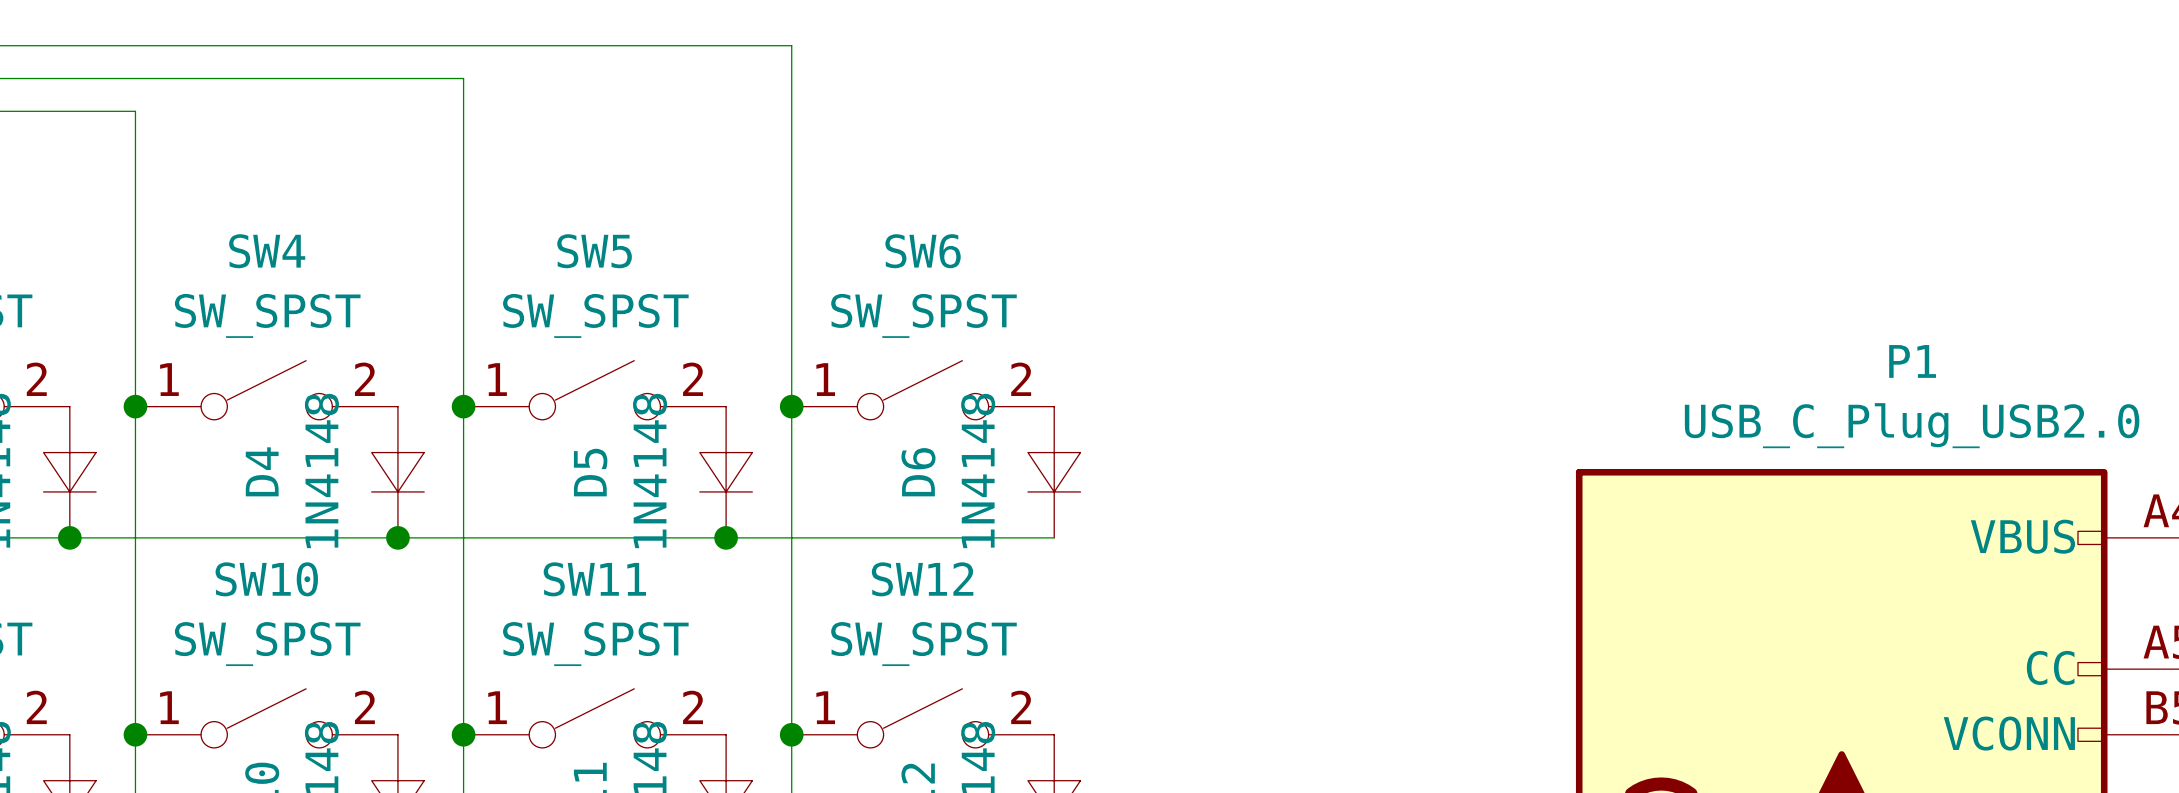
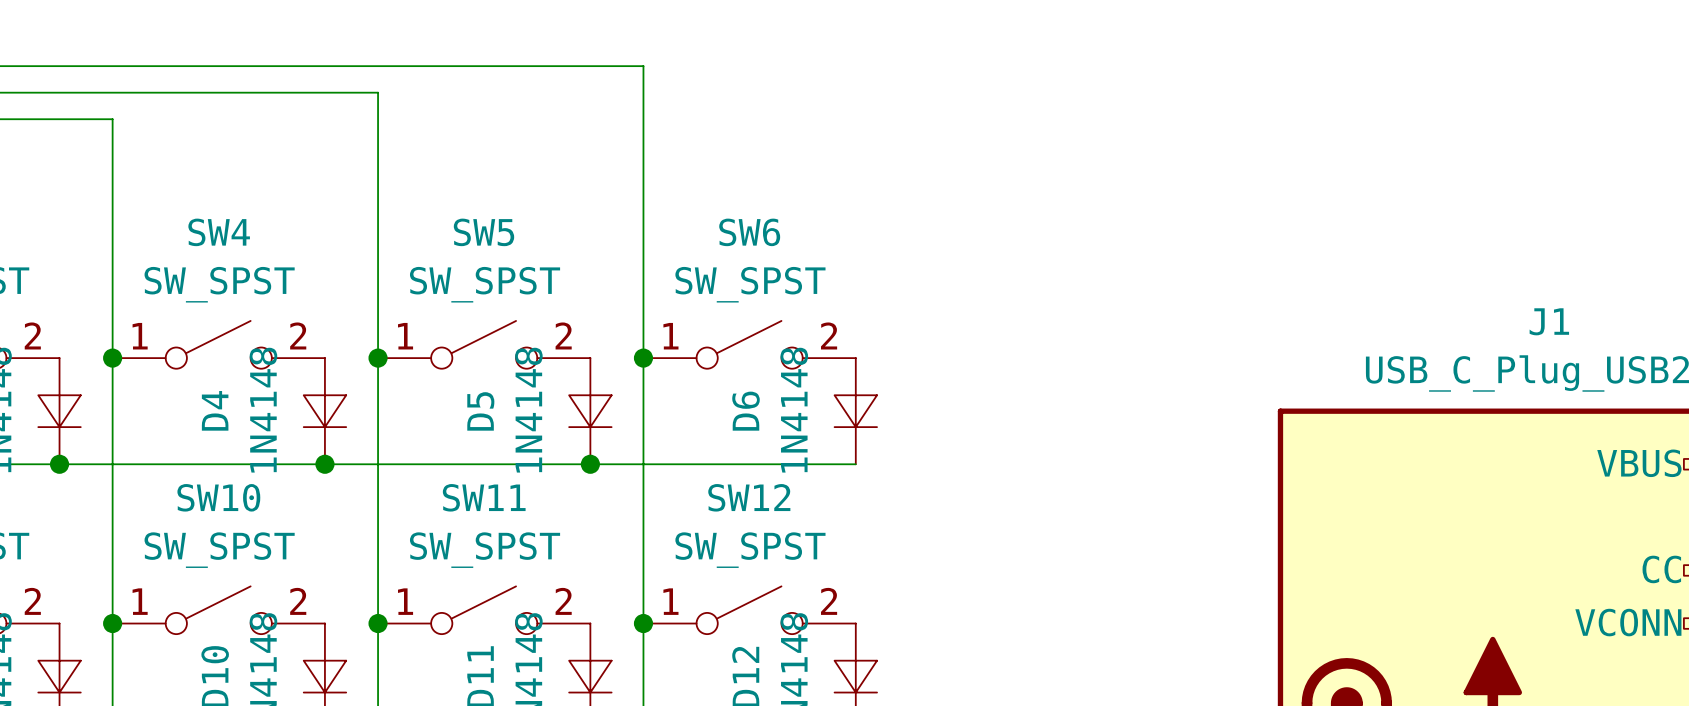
P1 name: P1 (1912, 361) -> J1 (1549, 321)

